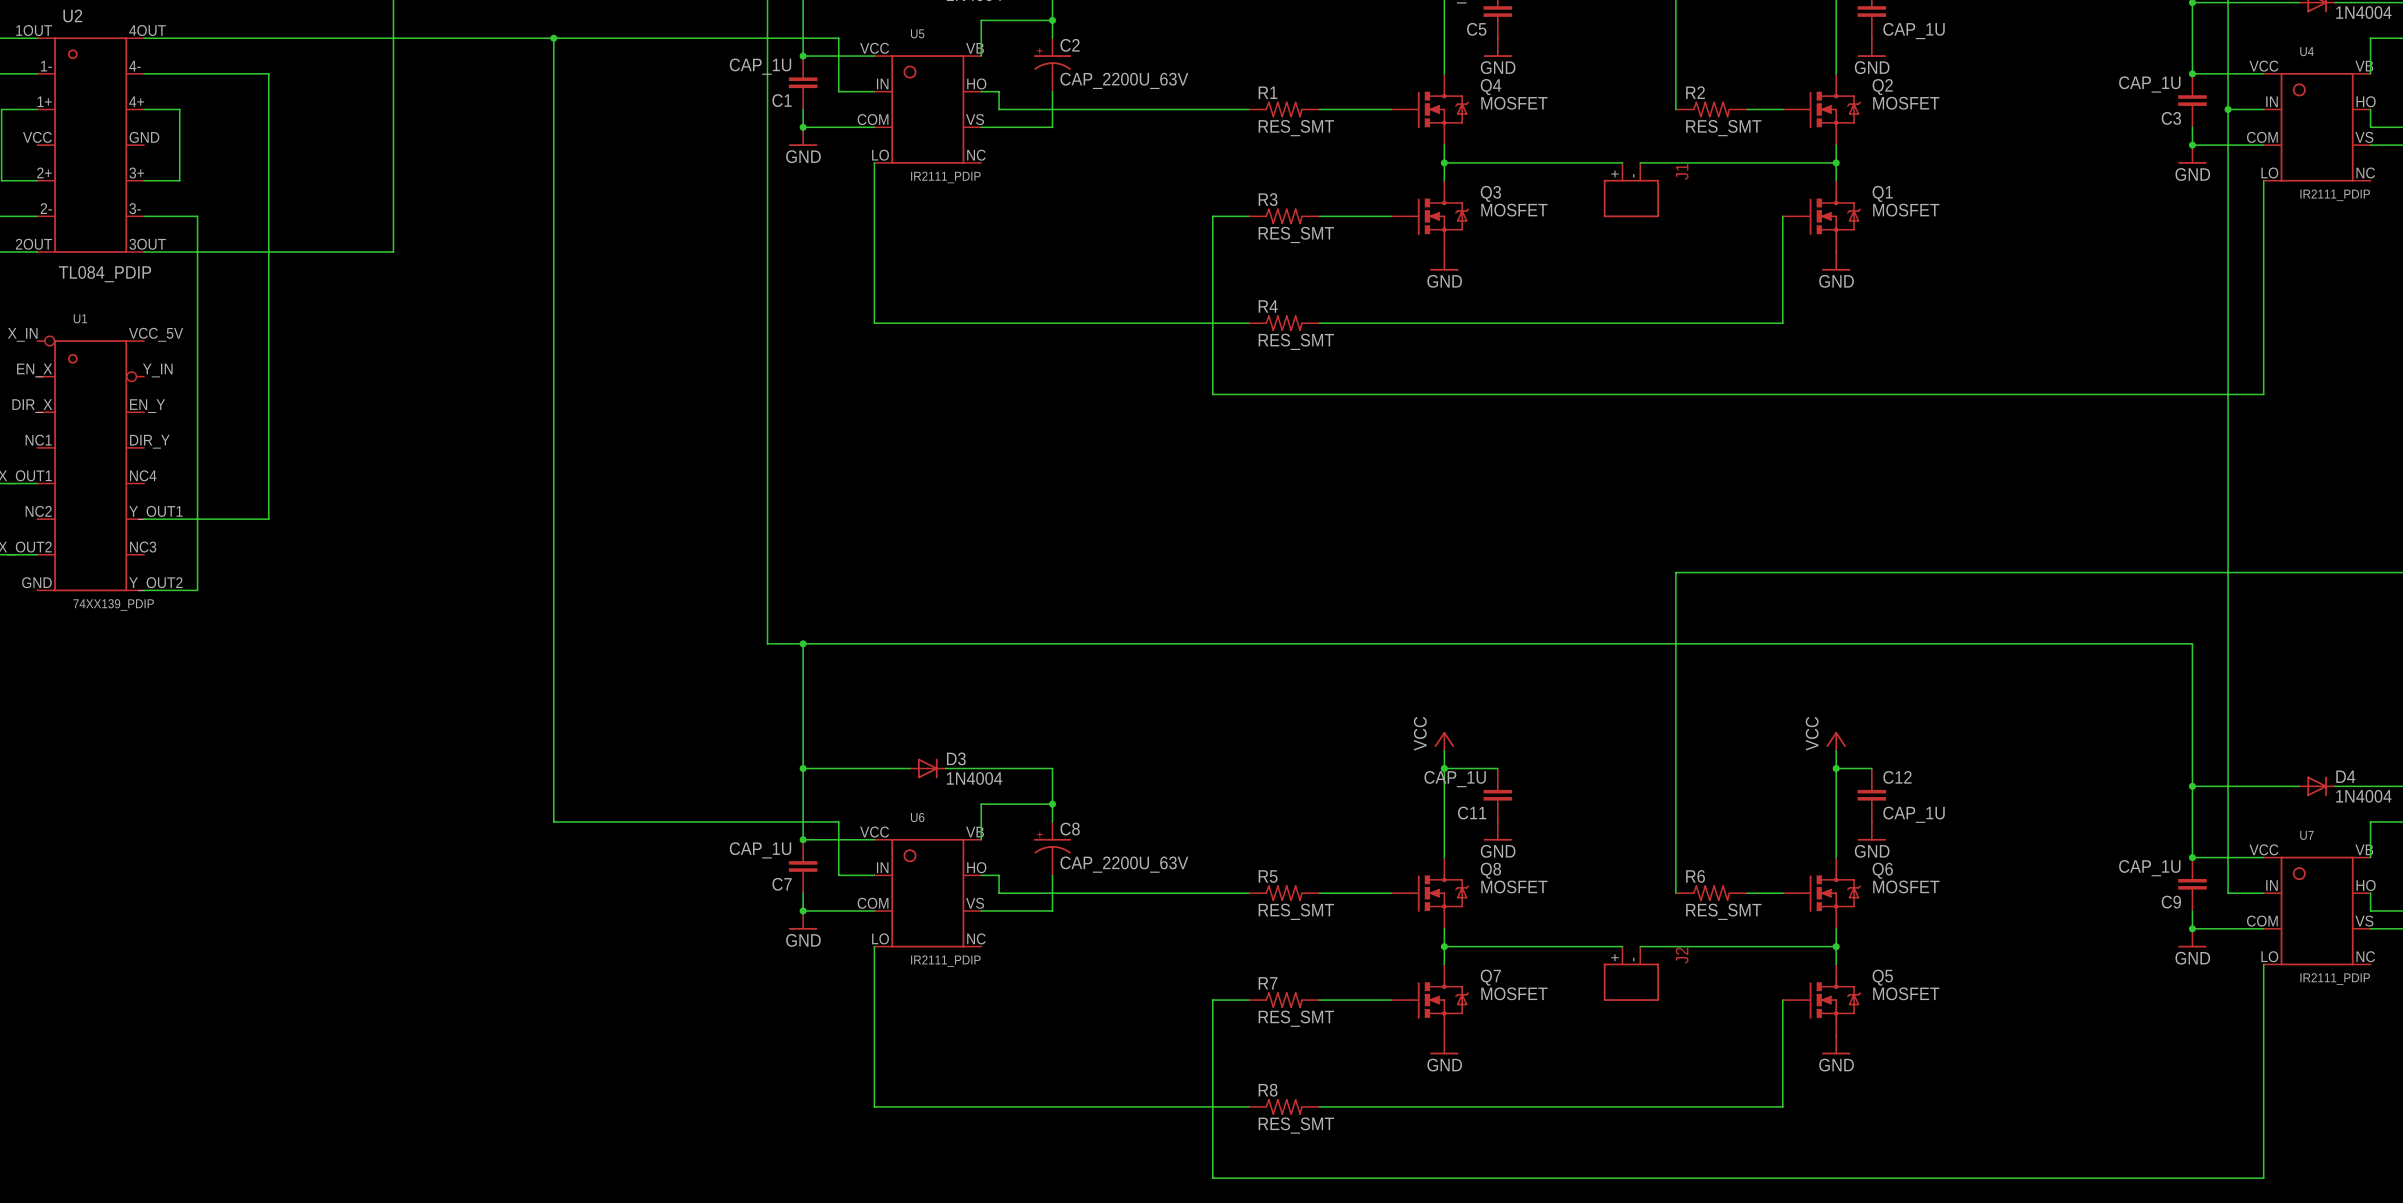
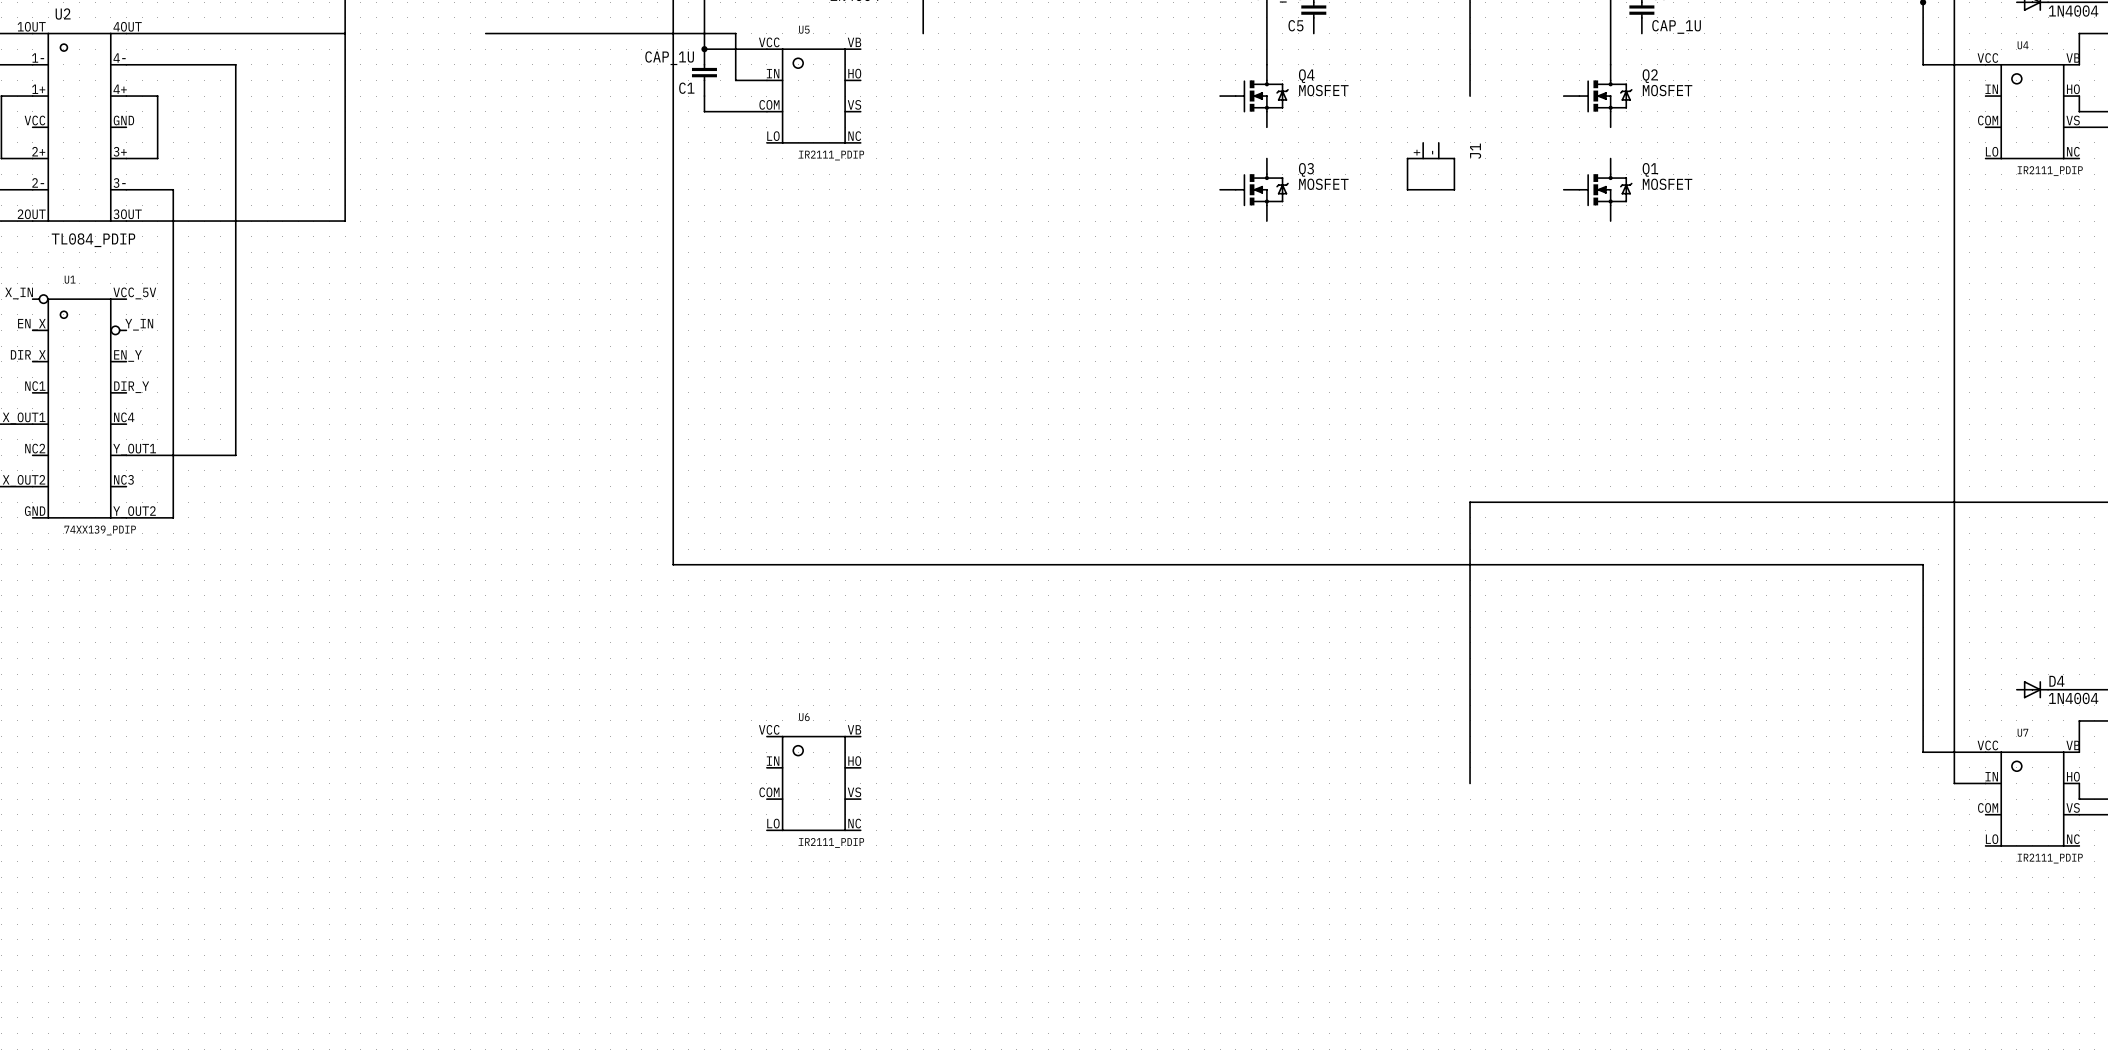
wire: (2192, 2) (2299, 2) -> none
wire: (1052, 20) (981, 20) (981, 56) -> none
junction: (1052, 20) -> none
wire: (393, 38) (553, 38) (553, 821) (838, 821) (838, 875) (874, 875) -> none
junction: (553, 38) -> none
power symbol: GND (1497, 47) -> none
power symbol: GND (1871, 47) -> none
C2: CAP_2200U_63V (1052, 64) -> none
junction: (2192, 73) -> none
wire: (981, 91) (999, 91) (999, 109) (1248, 109) -> none
wire: (1052, 91) (1052, 127) (981, 127) -> none
C3: CAP_1U (2192, 100) -> none
R1: RES_SMT (1284, 109) -> none
wire: (1319, 109) (1390, 109) -> none
R2: RES_SMT (1711, 109) -> none
wire: (1747, 109) (1782, 109) -> none
wire: (2228, 109) (2263, 109) -> none
junction: (2228, 109) -> none
junction: (803, 127) -> none
wire: (2192, 127) (2192, 145) (2263, 145) -> none
power symbol: GND (803, 136) -> none
wire: (1444, 145) (1444, 180) -> none
wire: (1836, 145) (1836, 180) -> none
junction: (2192, 145) -> none
power symbol: GND (2192, 154) -> none
wire: (874, 162) (874, 323) (1248, 323) -> none
wire: (1444, 162) (1622, 162) -> none
junction: (1444, 162) -> none
wire: (1640, 162) (1836, 162) -> none
junction: (1836, 162) -> none
wire: (2263, 180) (2263, 394) (1212, 394) (1212, 216) (1248, 216) -> none
R3: RES_SMT (1284, 216) -> none
wire: (1319, 216) (1390, 216) -> none
wire: (1782, 216) (1782, 323) (1319, 323) -> none
power symbol: GND (1444, 261) -> none
power symbol: GND (1836, 261) -> none
R4: RES_SMT (1284, 323) -> none
wire: (803, 643) (803, 839) (874, 839) -> none
junction: (803, 643) -> none
power symbol: VCC (1444, 741) -> none
power symbol: VCC (1836, 741) -> none
wire: (1444, 750) (1444, 857) -> none
wire: (1836, 750) (1836, 857) -> none
wire: (803, 768) (910, 768) -> none
junction: (803, 768) -> none
D3: 1N4004 (927, 768) -> none
wire: (945, 768) (1052, 768) (1052, 821) -> none
wire: (1444, 768) (1497, 768) -> none
junction: (1444, 768) -> none
wire: (1836, 768) (1871, 768) -> none
junction: (1836, 768) -> none
wire: (2192, 786) (2299, 786) -> none
junction: (2192, 786) -> none
C11: CAP_1U (1497, 795) -> none
C12: CAP_1U (1871, 795) -> none
wire: (1052, 804) (981, 804) (981, 839) -> none
junction: (1052, 804) -> none
power symbol: GND (1497, 831) -> none
power symbol: GND (1871, 831) -> none
junction: (803, 839) -> none
C8: CAP_2200U_63V (1052, 848) -> none
junction: (2192, 857) -> none
C7: CAP_1U (803, 866) -> none
wire: (981, 875) (999, 875) (999, 893) (1248, 893) -> none
wire: (1052, 875) (1052, 911) (981, 911) -> none
C9: CAP_1U (2192, 884) -> none
wire: (803, 893) (803, 911) (874, 911) -> none
R5: RES_SMT (1284, 893) -> none
wire: (1319, 893) (1390, 893) -> none
Q8: MOSFET (1429, 893) -> none
R6: RES_SMT (1711, 893) -> none
wire: (1747, 893) (1782, 893) -> none
Q6: MOSFET (1821, 893) -> none
junction: (803, 911) -> none
wire: (2192, 911) (2192, 928) (2263, 928) -> none
power symbol: GND (803, 920) -> none
wire: (1444, 928) (1444, 964) -> none
wire: (1836, 928) (1836, 964) -> none
junction: (2192, 928) -> none
power symbol: GND (2192, 938) -> none
wire: (874, 946) (874, 1106) (1248, 1106) -> none
wire: (1444, 946) (1622, 946) -> none
junction: (1444, 946) -> none
wire: (1640, 946) (1836, 946) -> none
junction: (1836, 946) -> none
wire: (2263, 964) (2263, 1178) (1212, 1178) (1212, 1000) (1248, 1000) -> none
J2: (1631, 973) -> none
R7: RES_SMT (1284, 1000) -> none
wire: (1319, 1000) (1390, 1000) -> none
Q7: MOSFET (1429, 1000) -> none
wire: (1782, 1000) (1782, 1106) (1319, 1106) -> none
Q5: MOSFET (1821, 1000) -> none
power symbol: GND (1444, 1045) -> none
power symbol: GND (1836, 1045) -> none
R8: RES_SMT (1284, 1106) -> none

